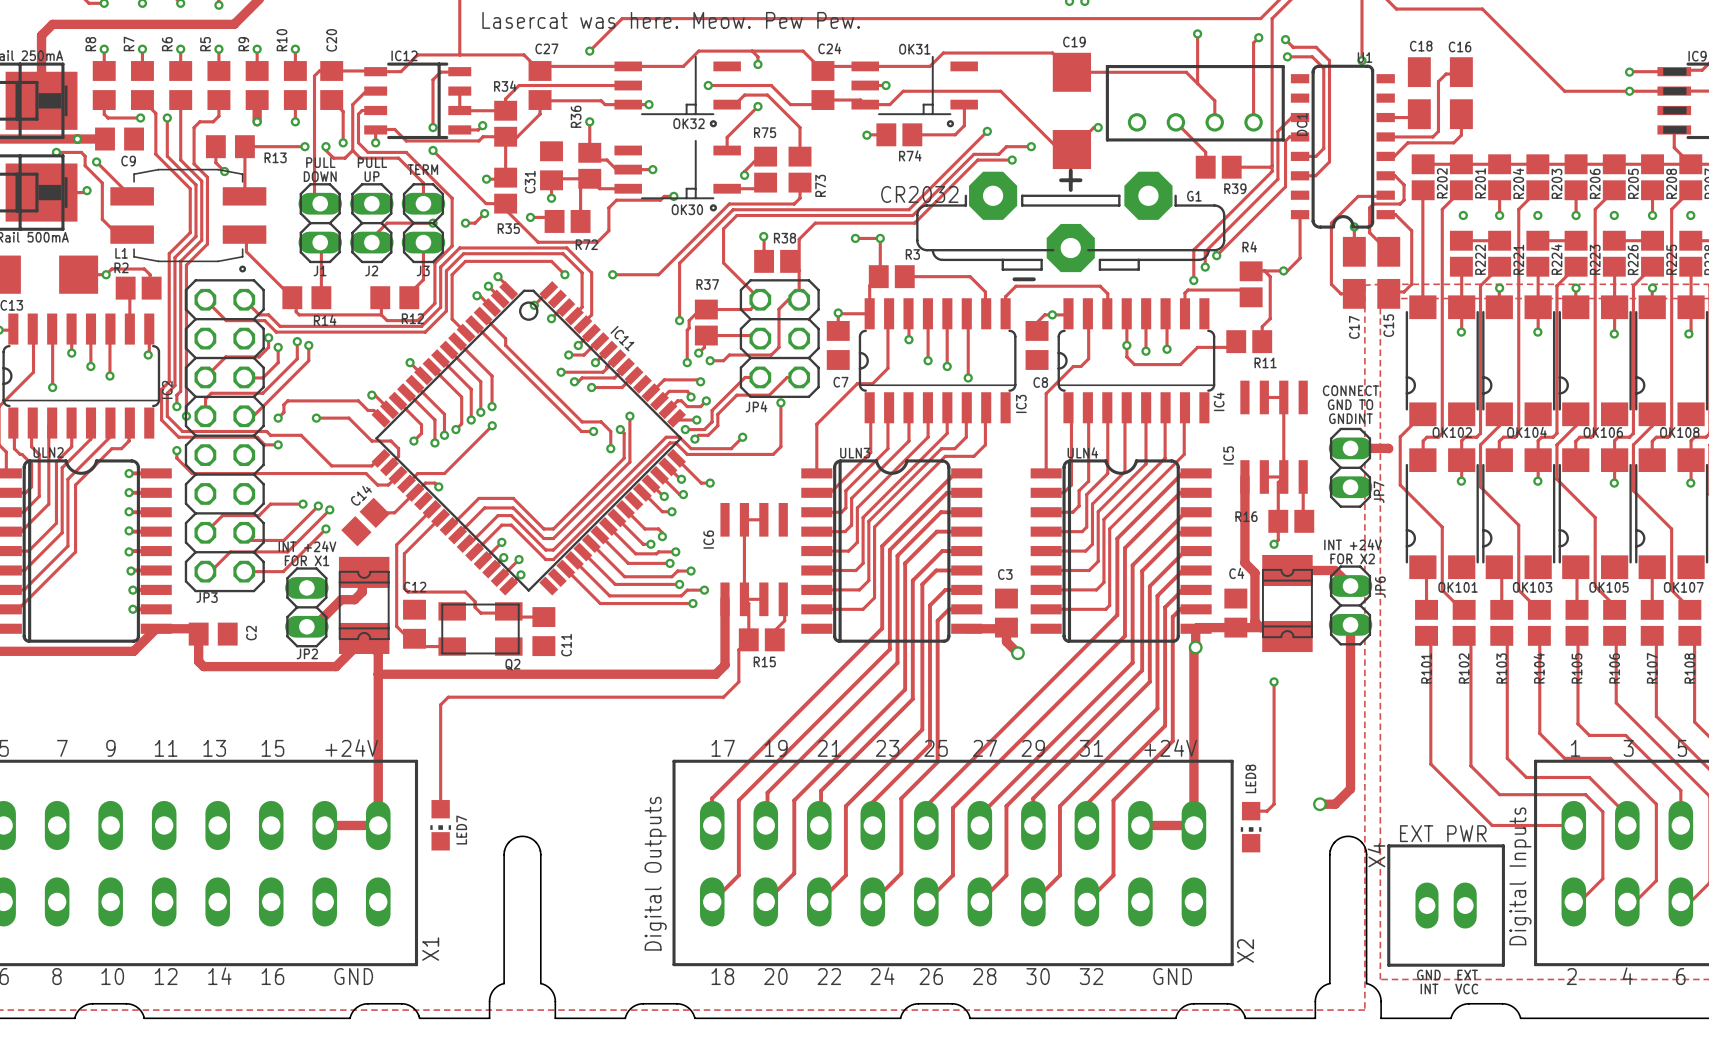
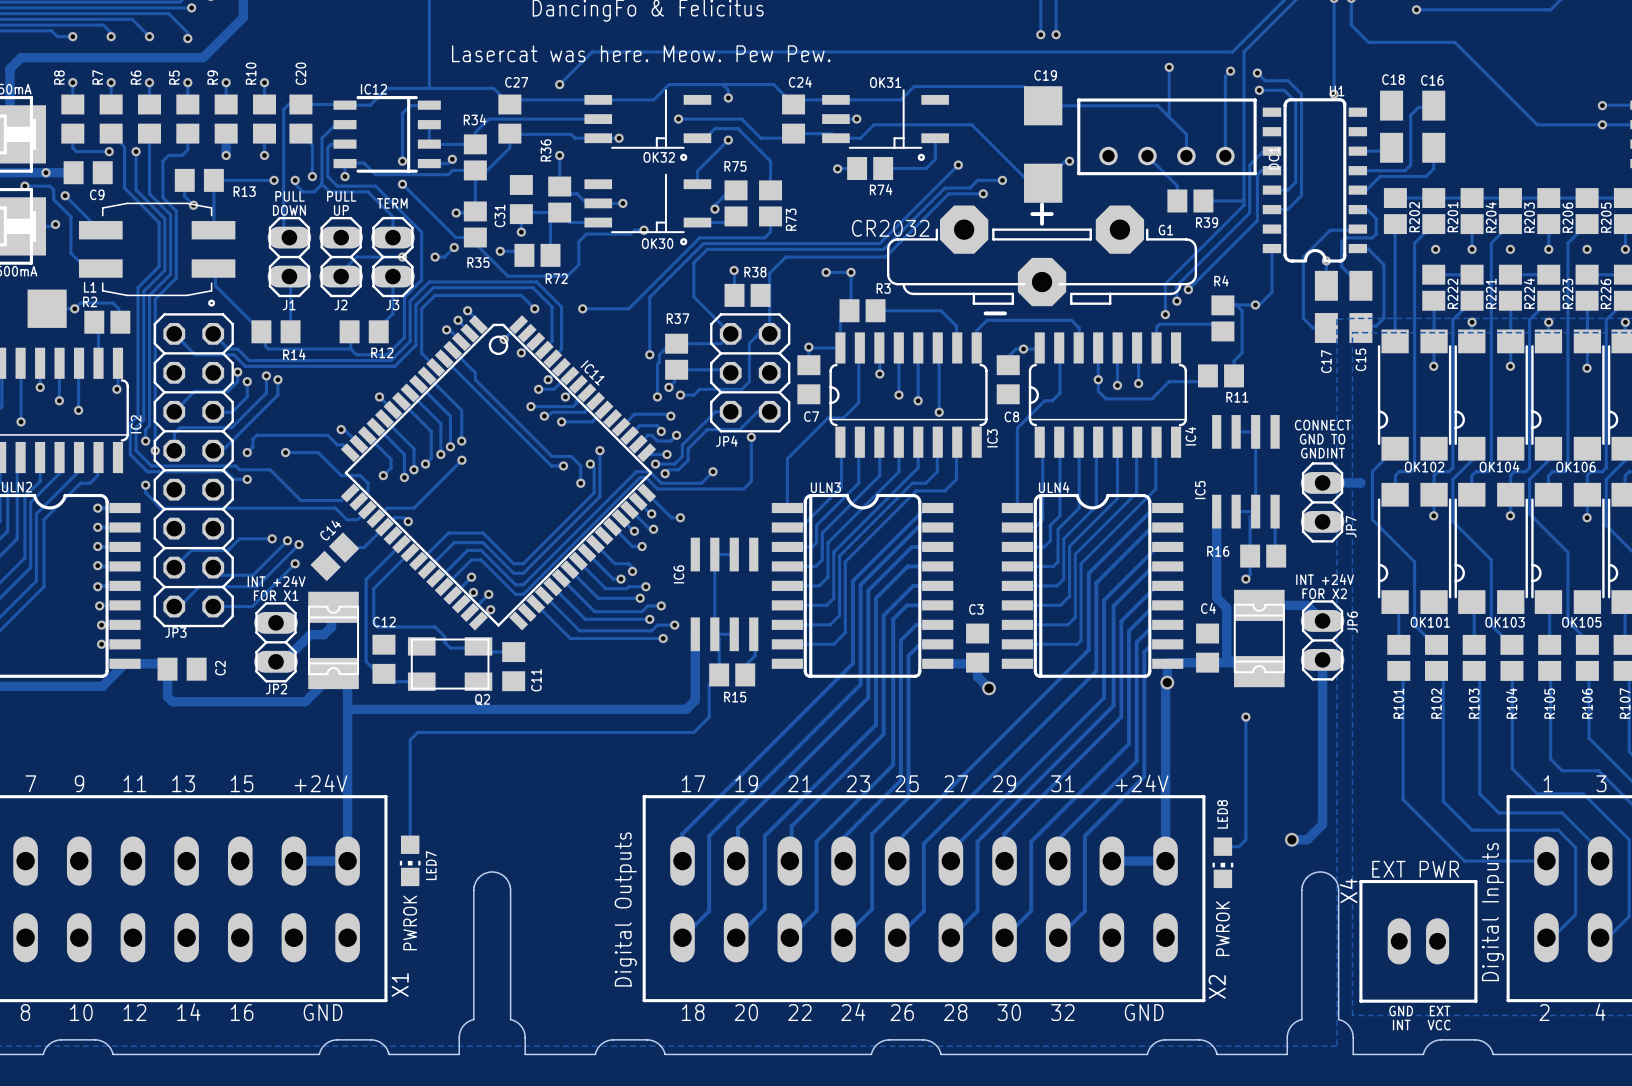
LED7 value: none -> PWROK (410, 922)
LED8 value: none -> PWROK (1222, 928)

